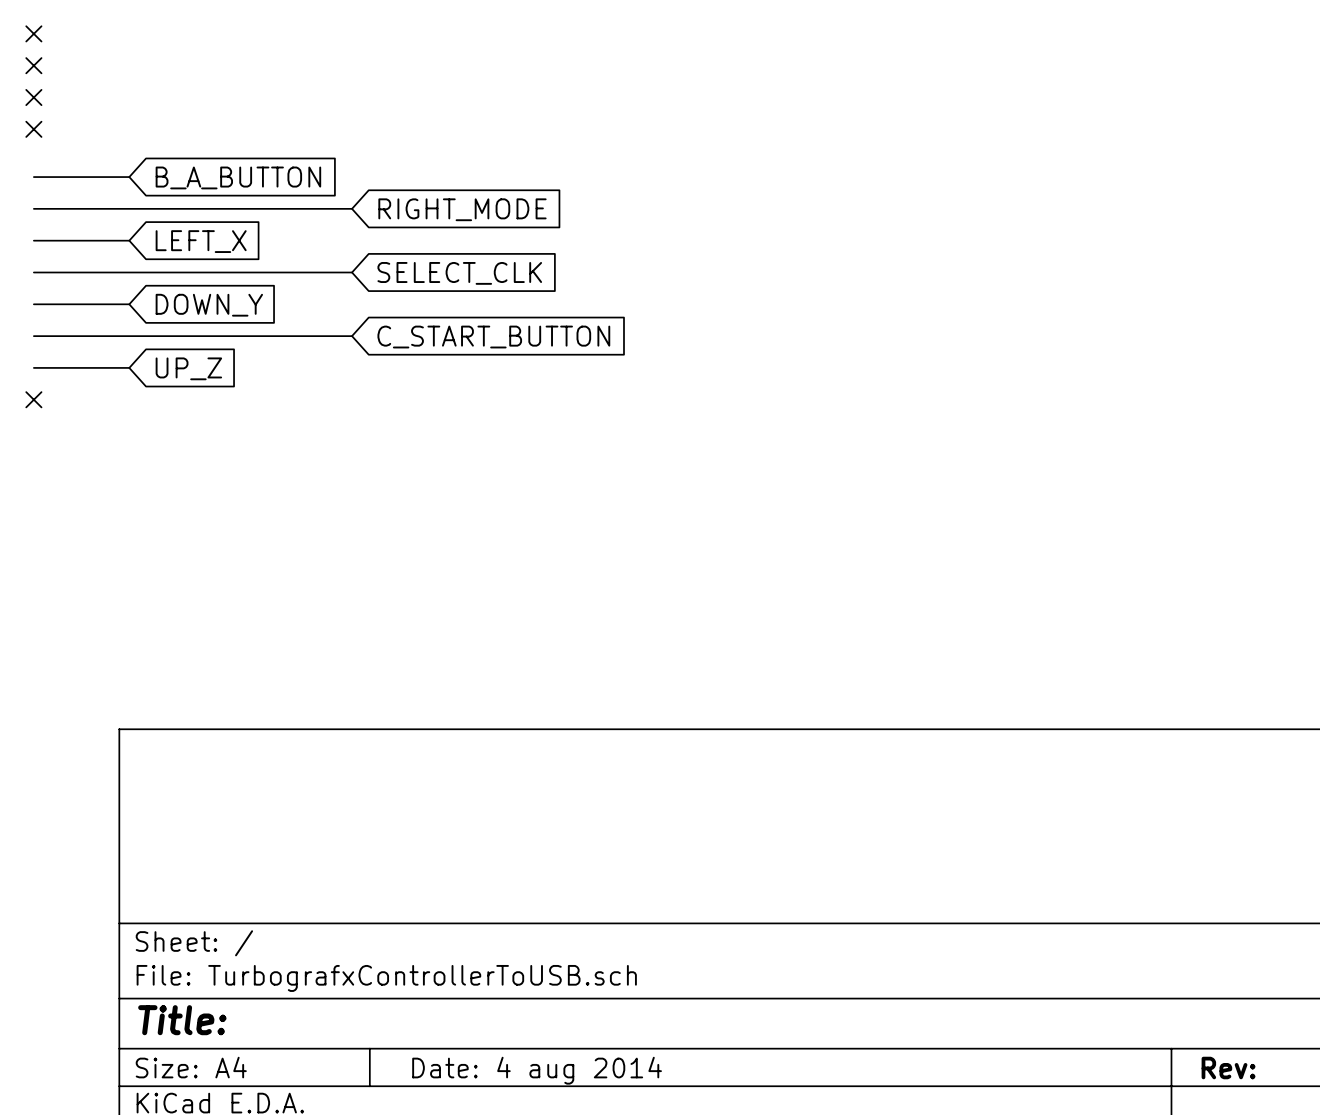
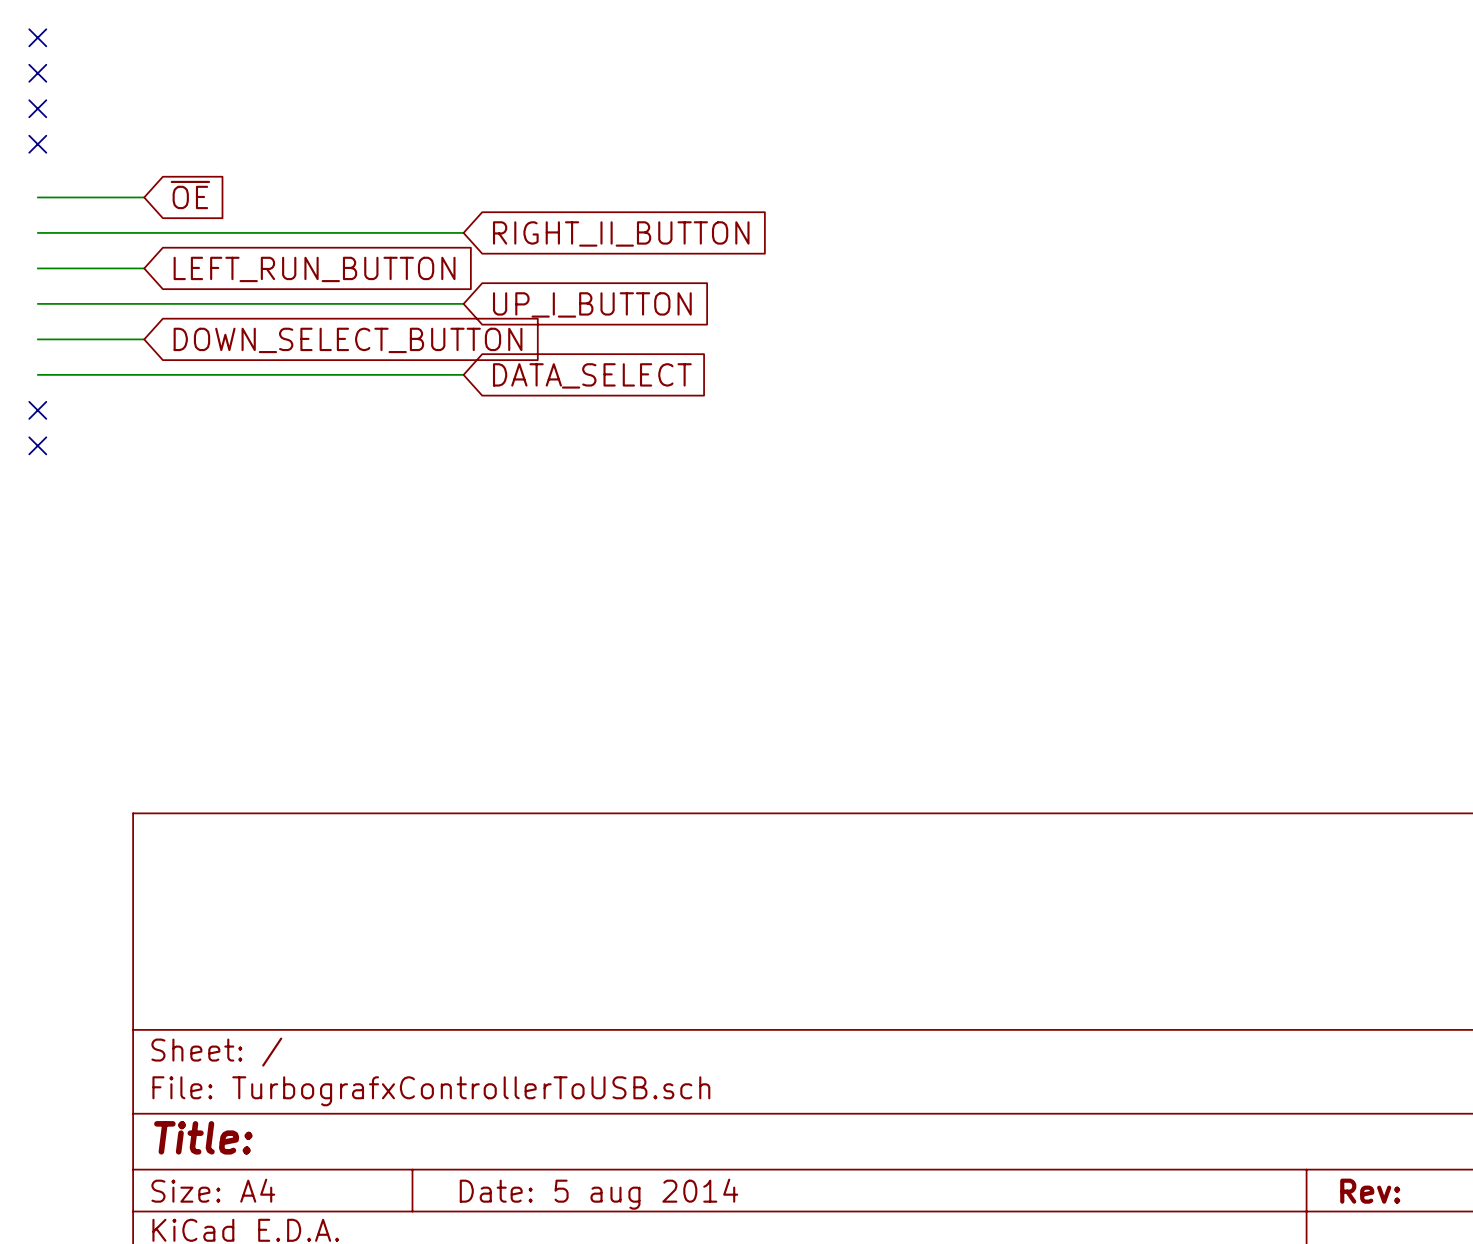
global label: B_A_BUTTON (238, 177) -> ~{OE} (190, 195)
wire: none -> (392, 232) (463, 232)
global label: RIGHT_MODE (462, 209) -> none
global label: none -> RIGHT_II_BUTTON (621, 233)
global label: LEFT_X (201, 241) -> LEFT_RUN_BUTTON (314, 269)
wire: none -> (392, 303) (463, 303)
global label: SELECT_CLK (459, 273) -> none
global label: none -> UP_I_BUTTON (592, 304)
global label: DOWN_Y (209, 305) -> DOWN_SELECT_BUTTON (348, 340)
wire: none -> (392, 374) (463, 374)
global label: C_START_BUTTON (493, 337) -> none
global label: none -> DATA_SELECT (592, 375)
wire: (33, 367) (129, 367) -> none
no-connect mark: none -> (37, 410)
global label: UP_Z (188, 368) -> none
title block: Date: 4 aug 2014 (537, 1070) -> Date: 5 aug 2014 (599, 1194)

